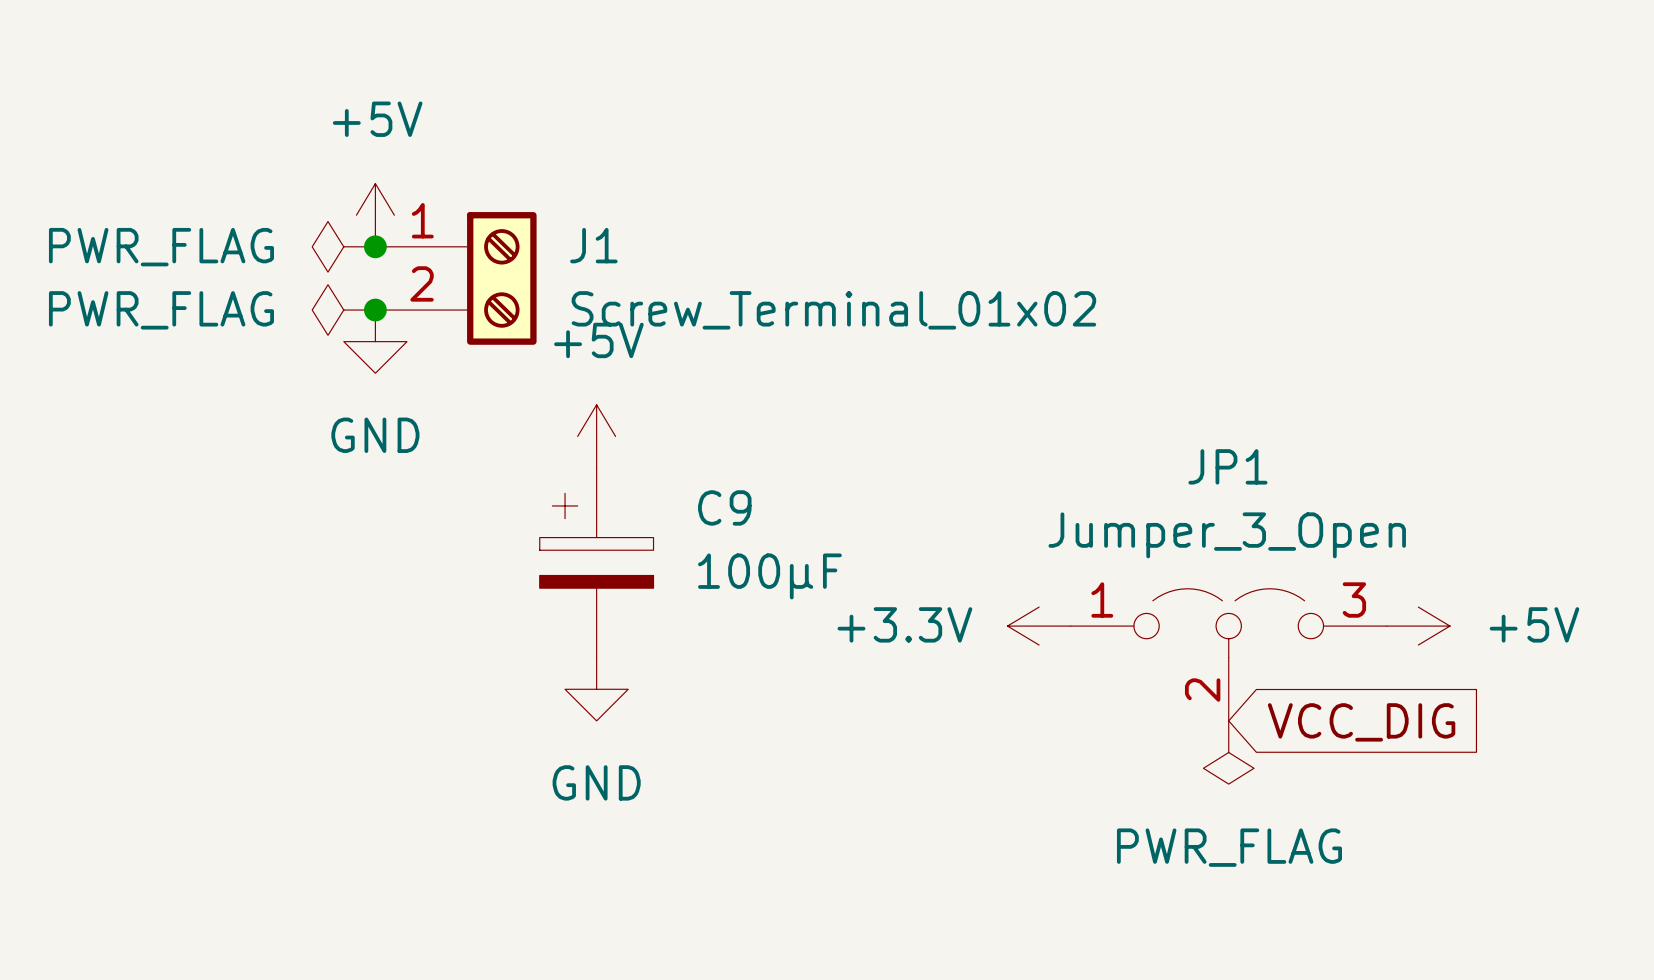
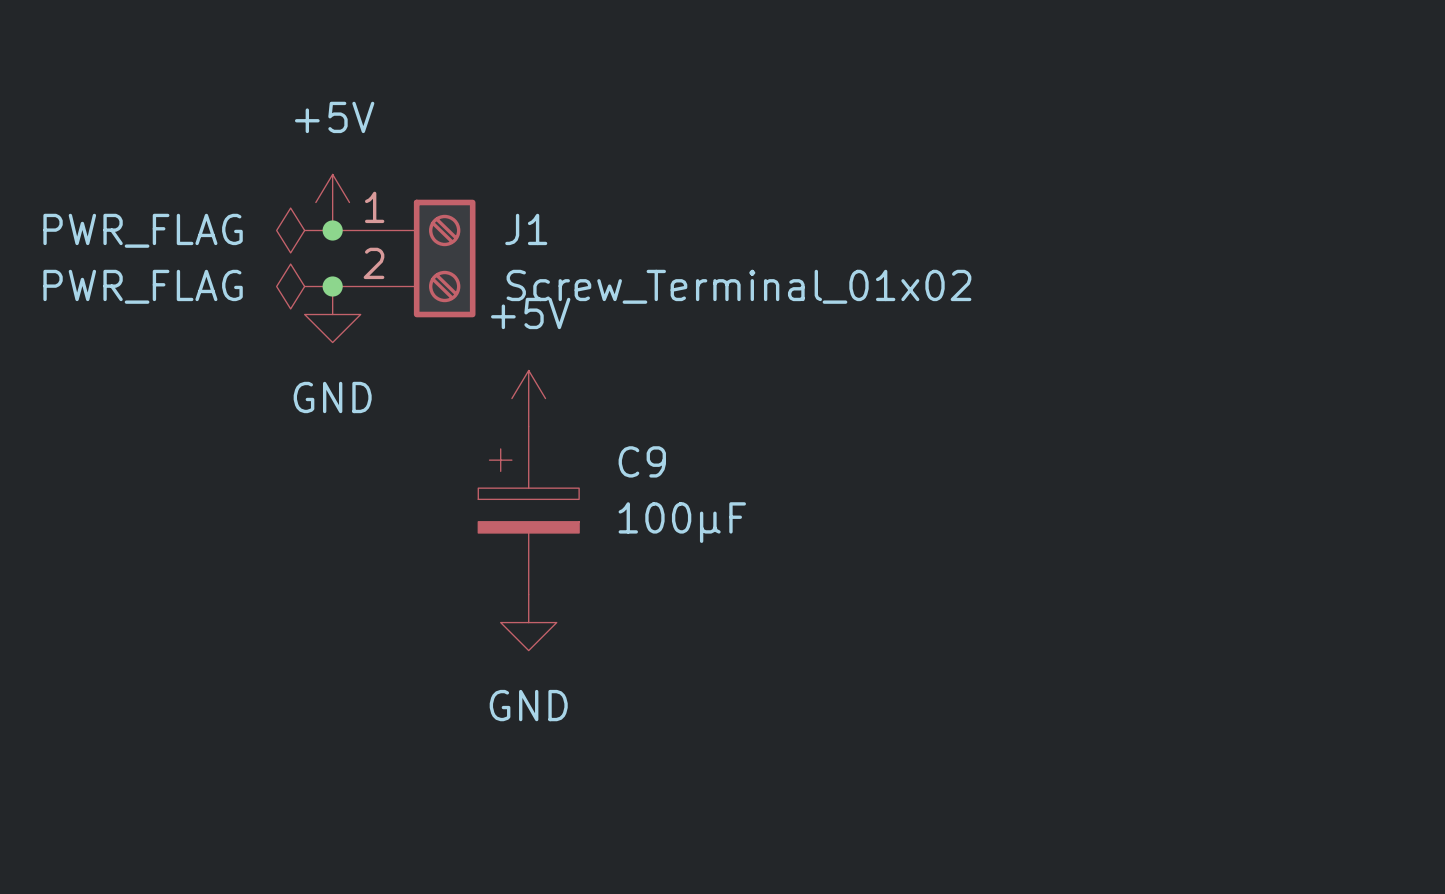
power symbol: +3.3V (1039, 626) -> none
power symbol: +5V (1418, 626) -> none
JP1: Jumper_3_Open (1228, 654) -> none
global label: VCC_DIG (1361, 722) -> none
power symbol: PWR_FLAG (1228, 752) -> none

